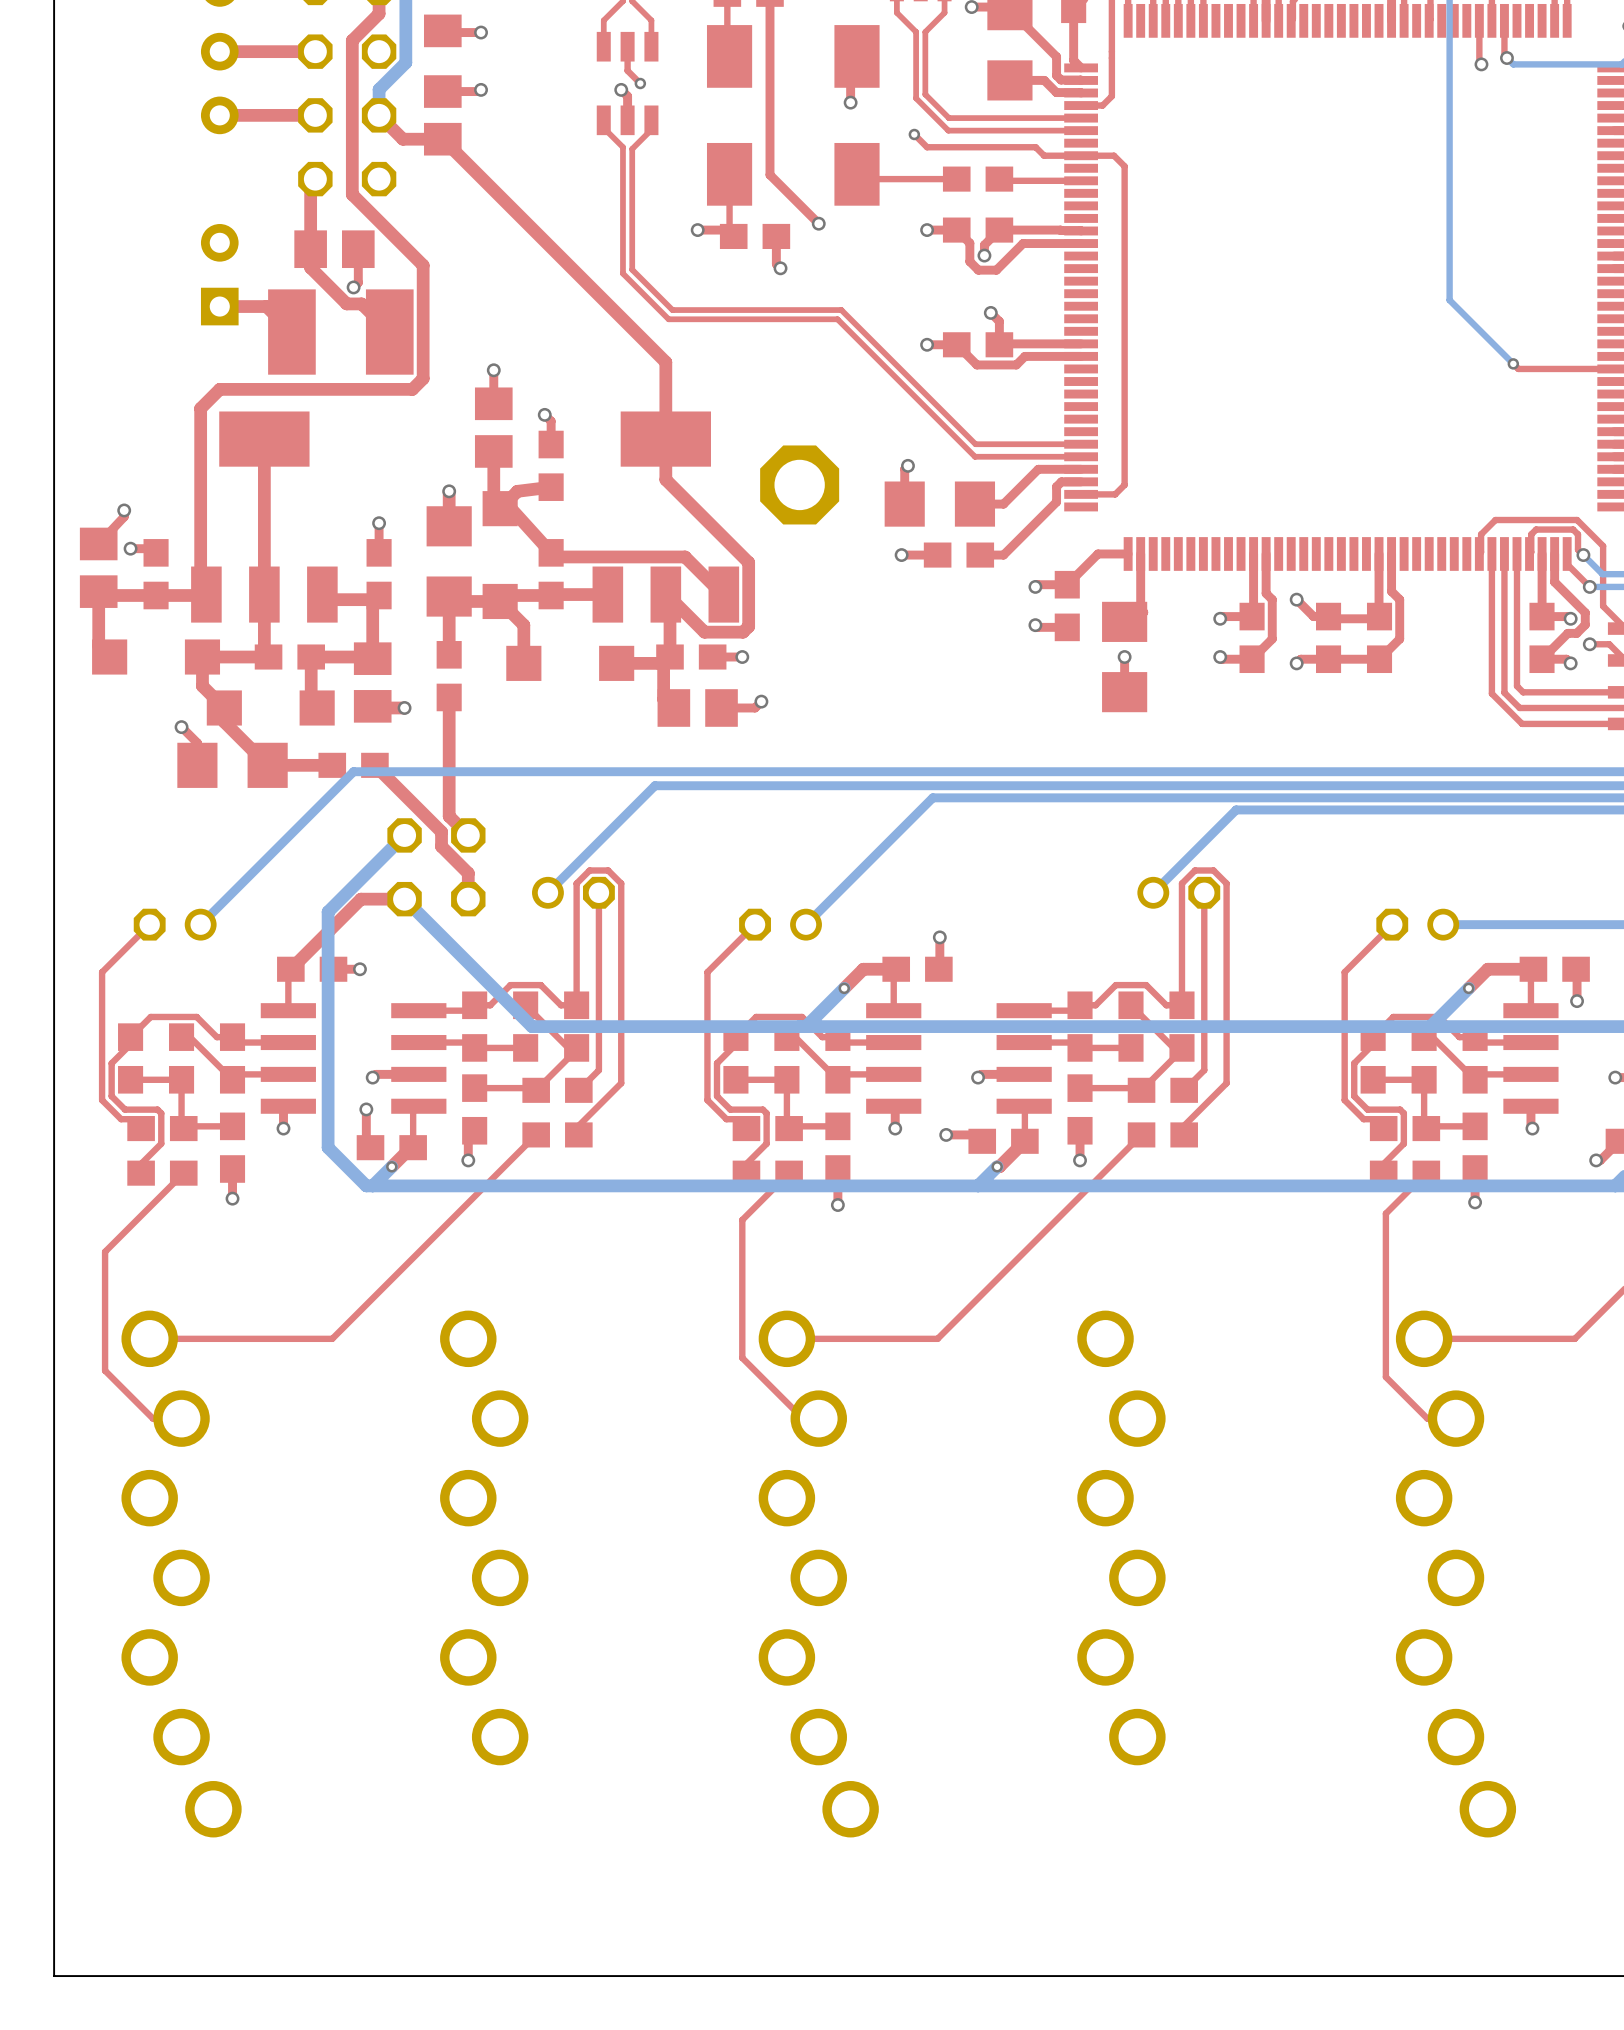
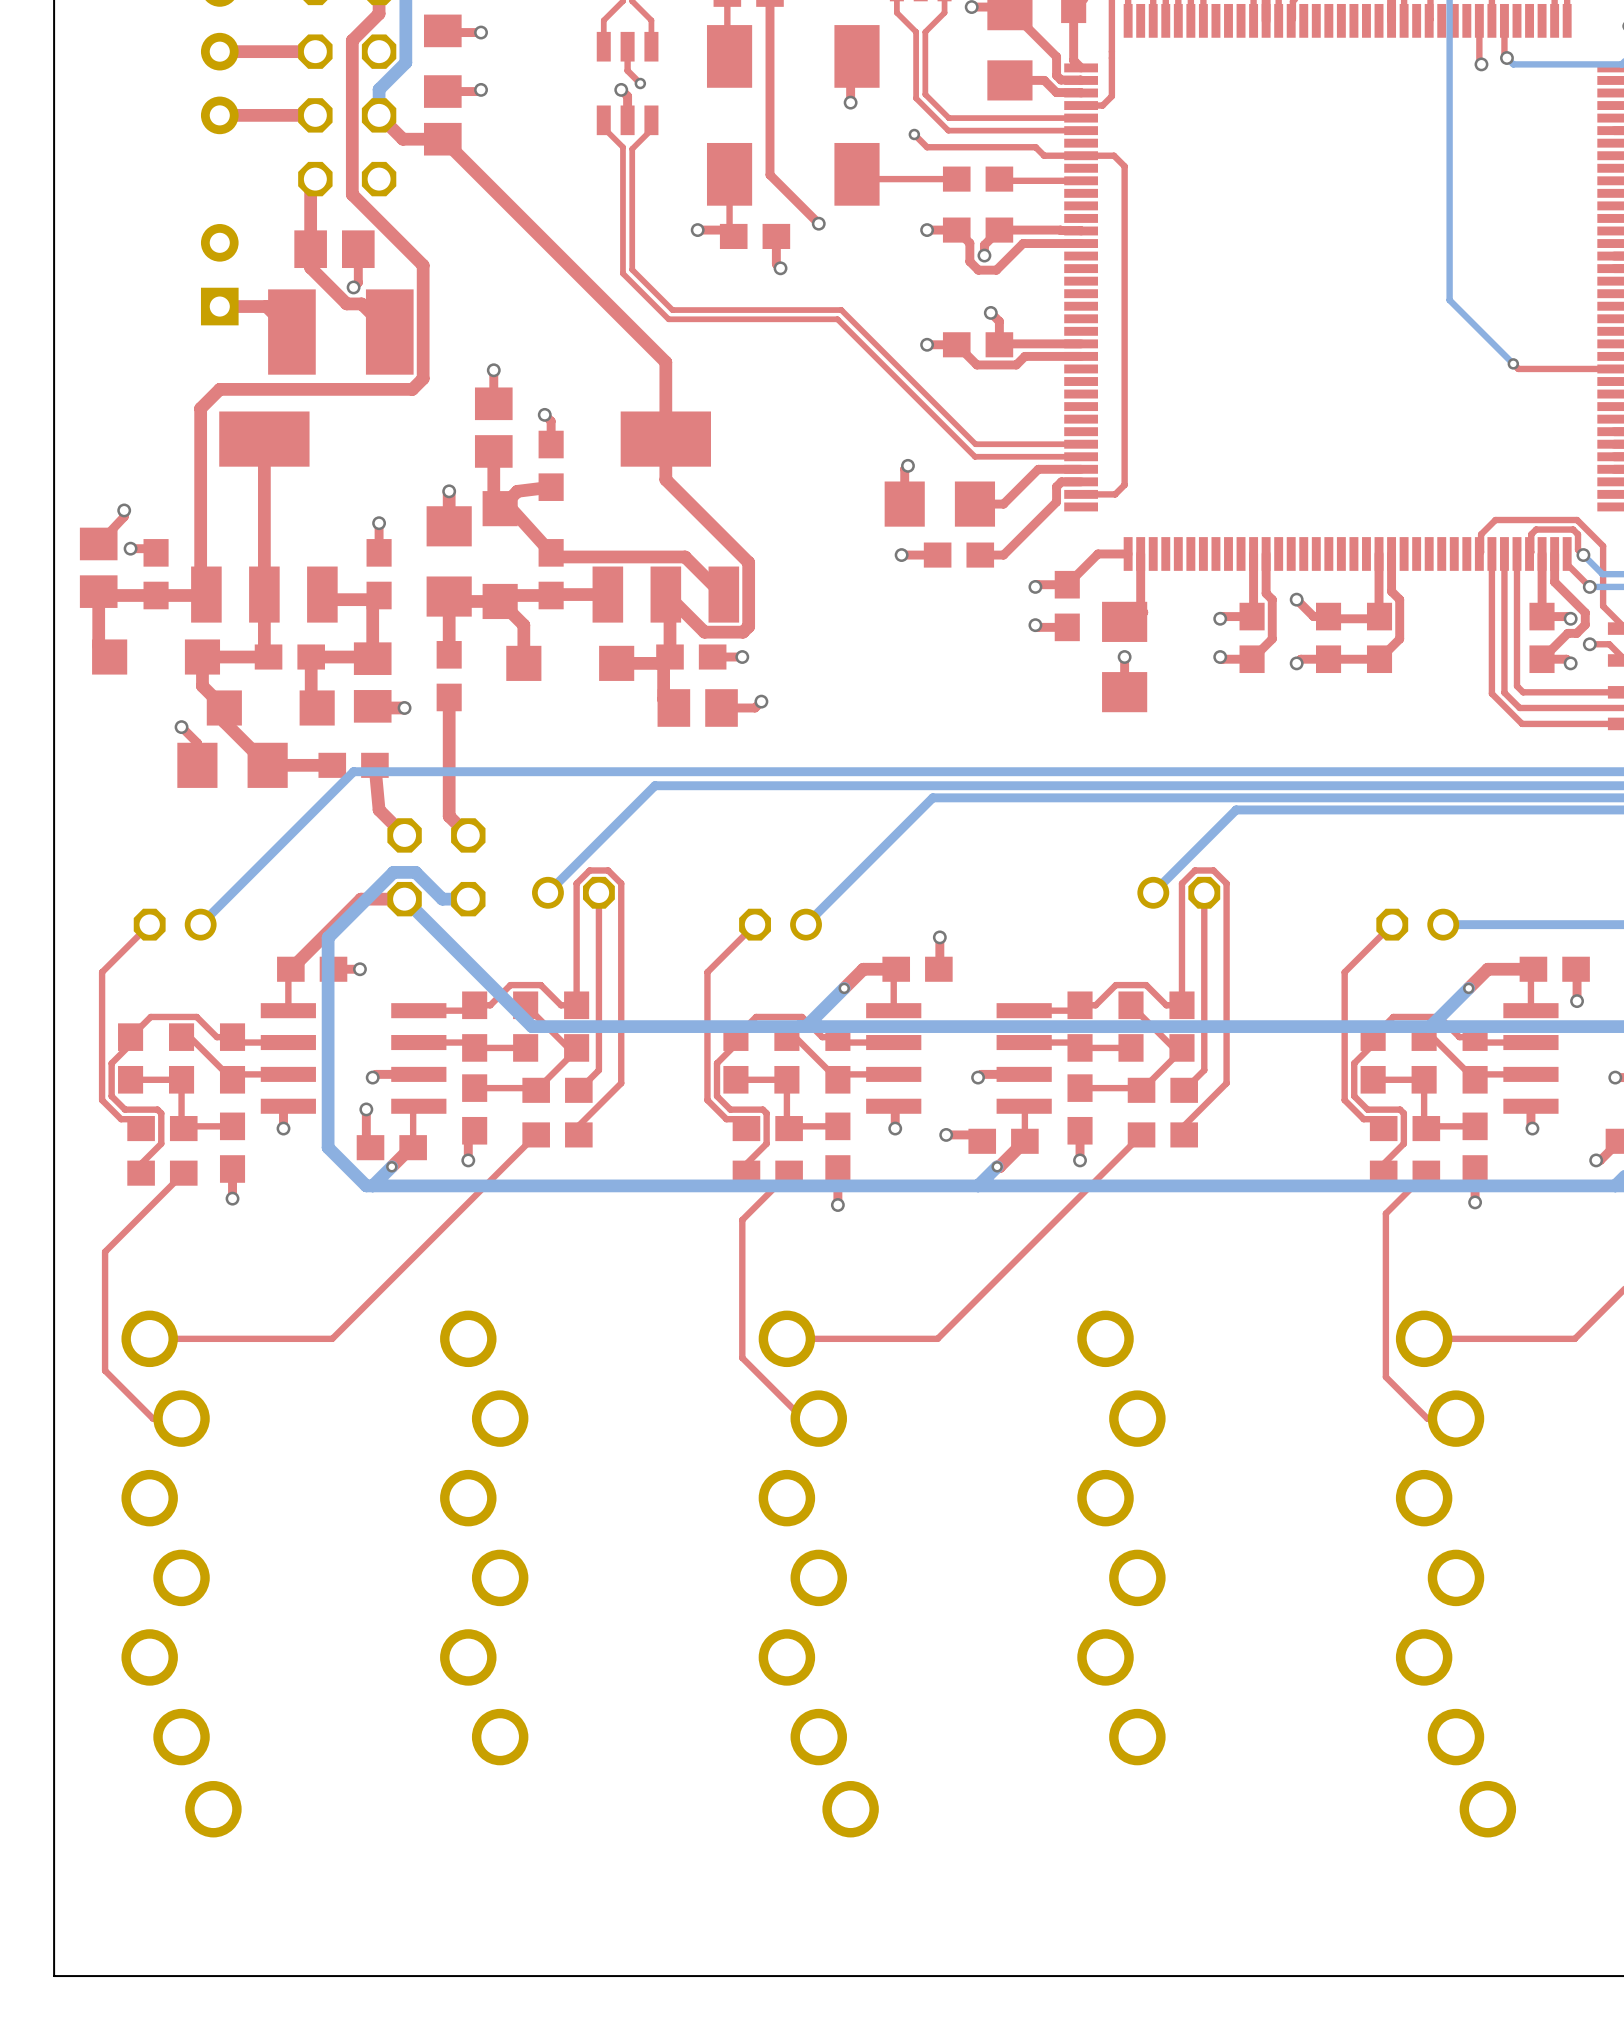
part: (799, 484) -> none
top track: (374, 765) (441, 831) (441, 846) (468, 873) (468, 899) -> (374, 765) (379, 809) (404, 835)
bottom track: (404, 835) (328, 911) (328, 937) -> (468, 899) (442, 899) (415, 872) (393, 872) (328, 937)

